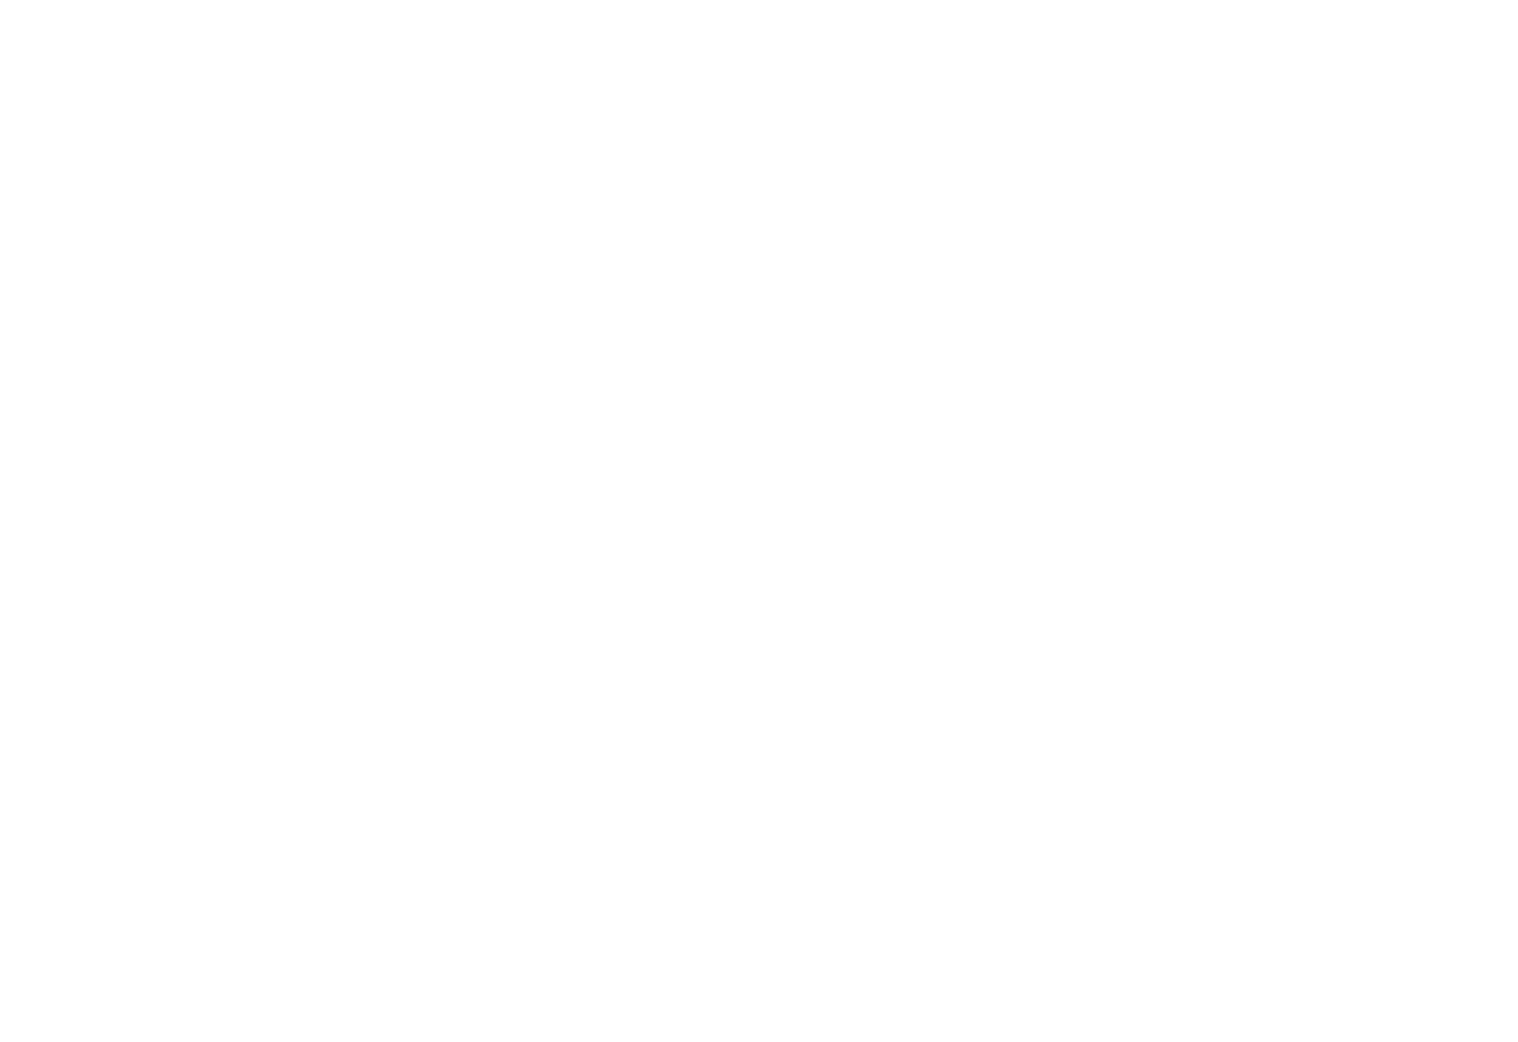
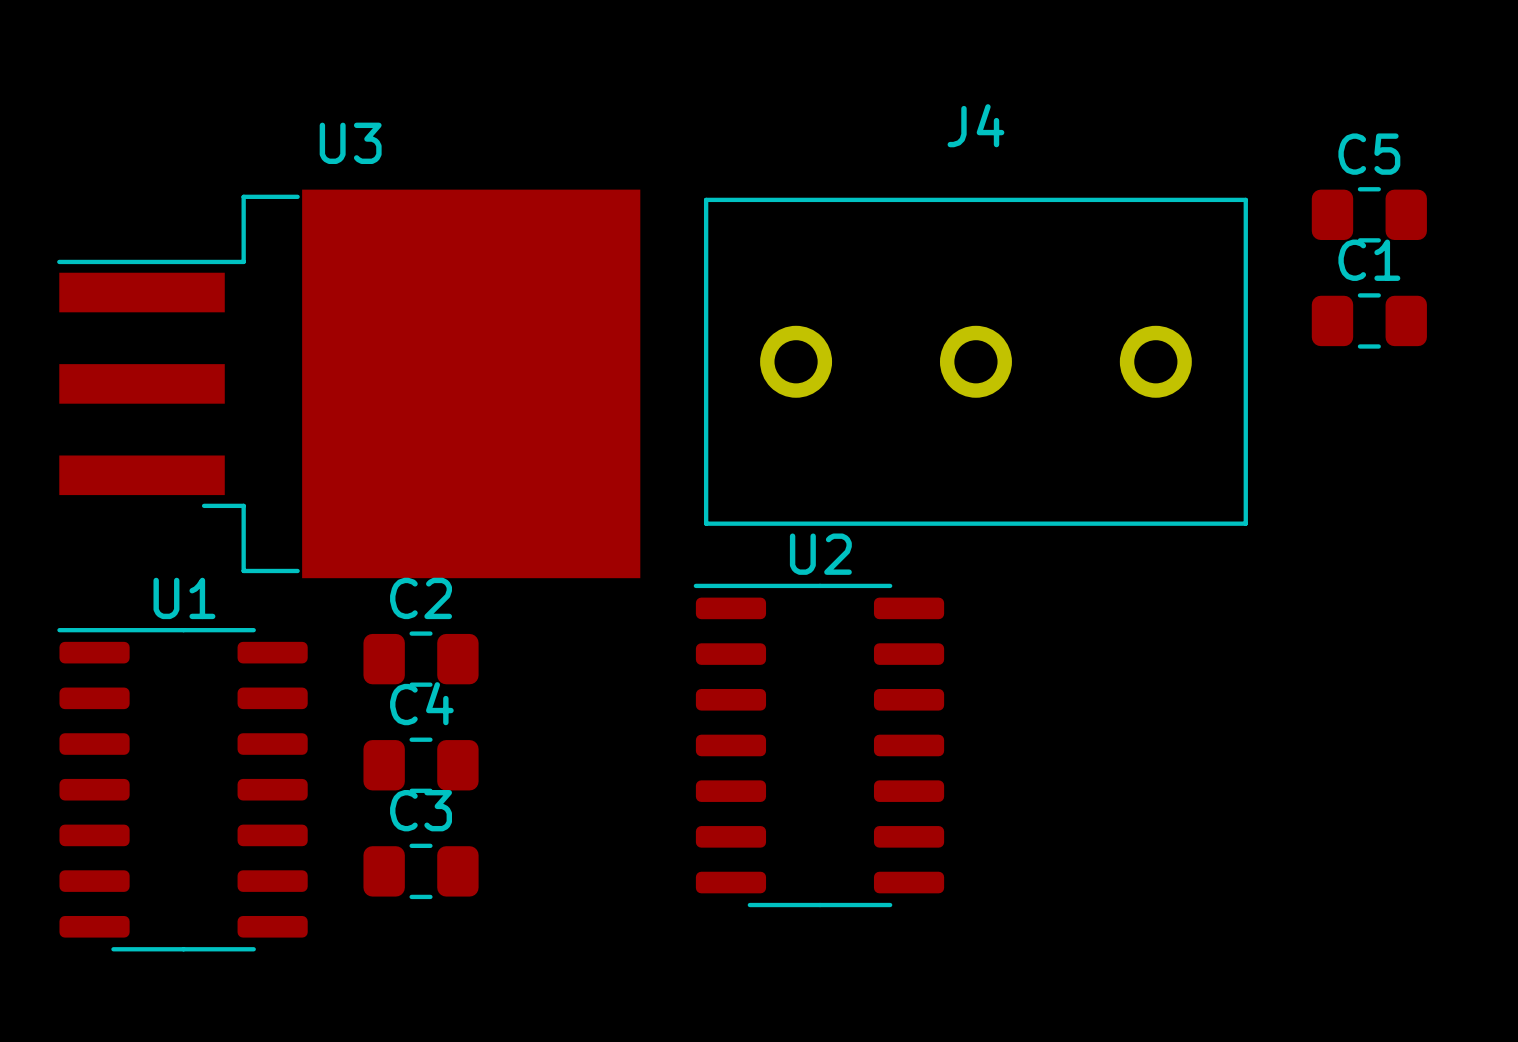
C5: none -> (1369, 214)
C1: none -> (1369, 320)
J4: none -> (975, 361)
U3: none -> (348, 383)
C2: none -> (421, 659)
U2: none -> (818, 745)
C4: none -> (421, 765)
U1: none -> (182, 789)
C3: none -> (421, 871)

